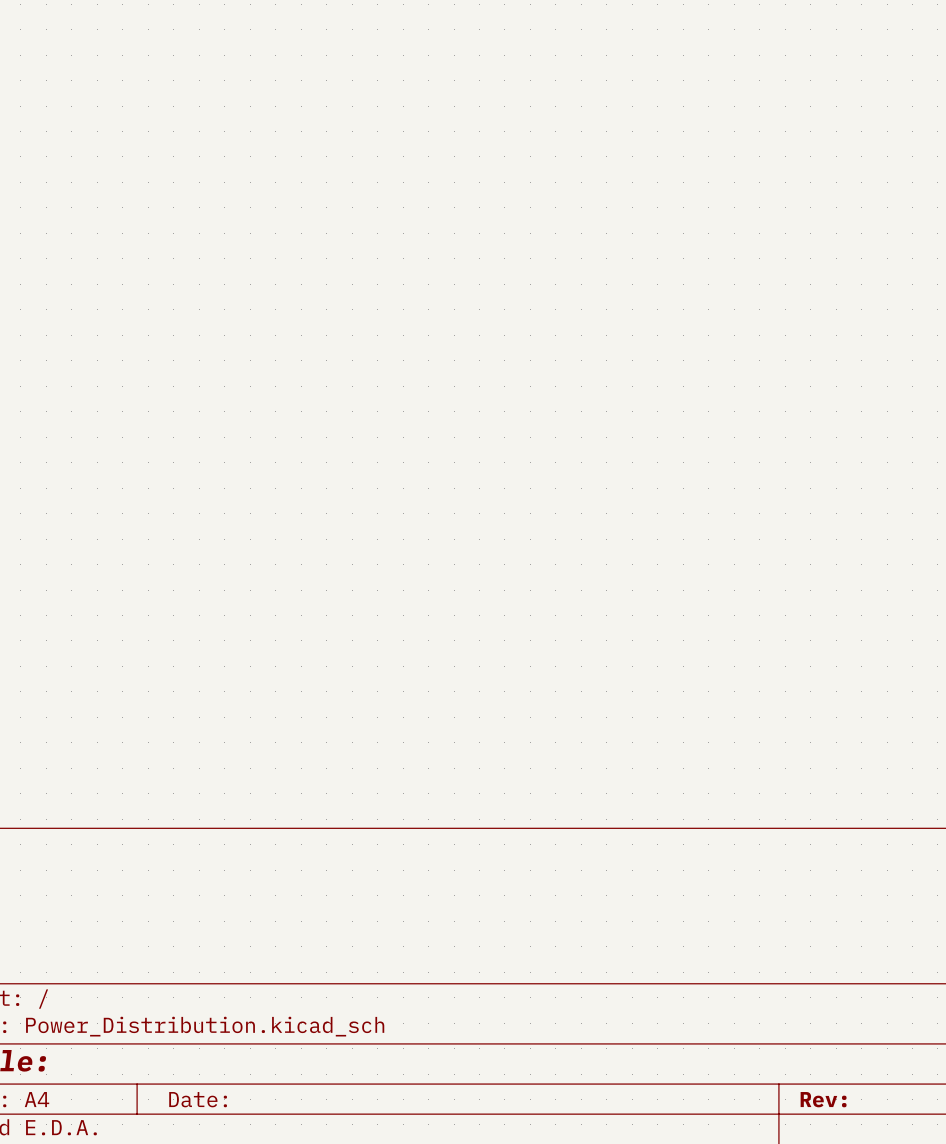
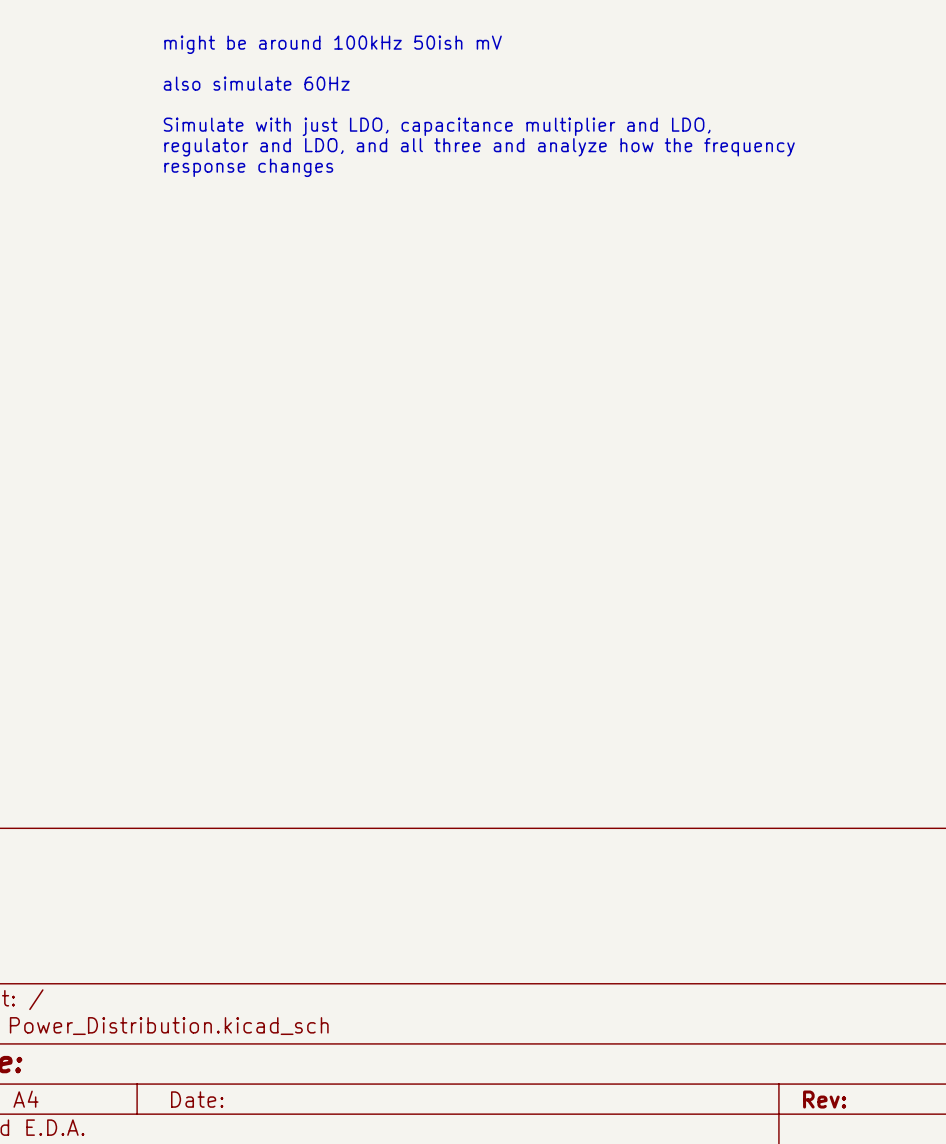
text: none -> might be around 100kHz 50ish mV (333, 44)
text: none -> also simulate 60Hz (256, 83)
text: none -> Simulate with just LDO, capacitance multiplier and LDO, (437, 126)
text: none -> regulator and LDO, and all three and analyze how the frequency (479, 147)
text: none -> response changes (248, 167)

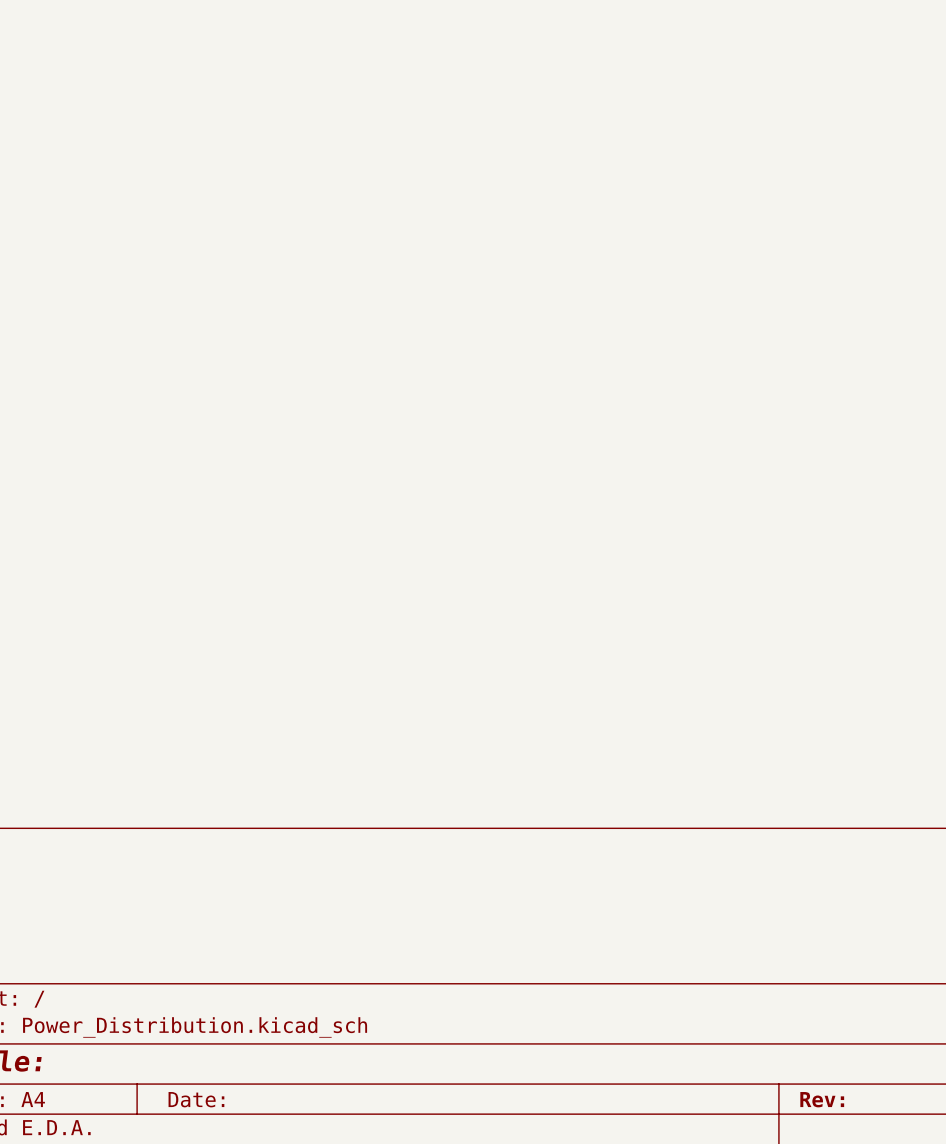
text: might be around 100kHz 50ish mV (333, 44) -> none
text: also simulate 60Hz (256, 83) -> none
text: Simulate with just LDO, capacitance multiplier and LDO, (437, 126) -> none
text: regulator and LDO, and all three and analyze how the frequency (479, 147) -> none
text: response changes (248, 167) -> none

